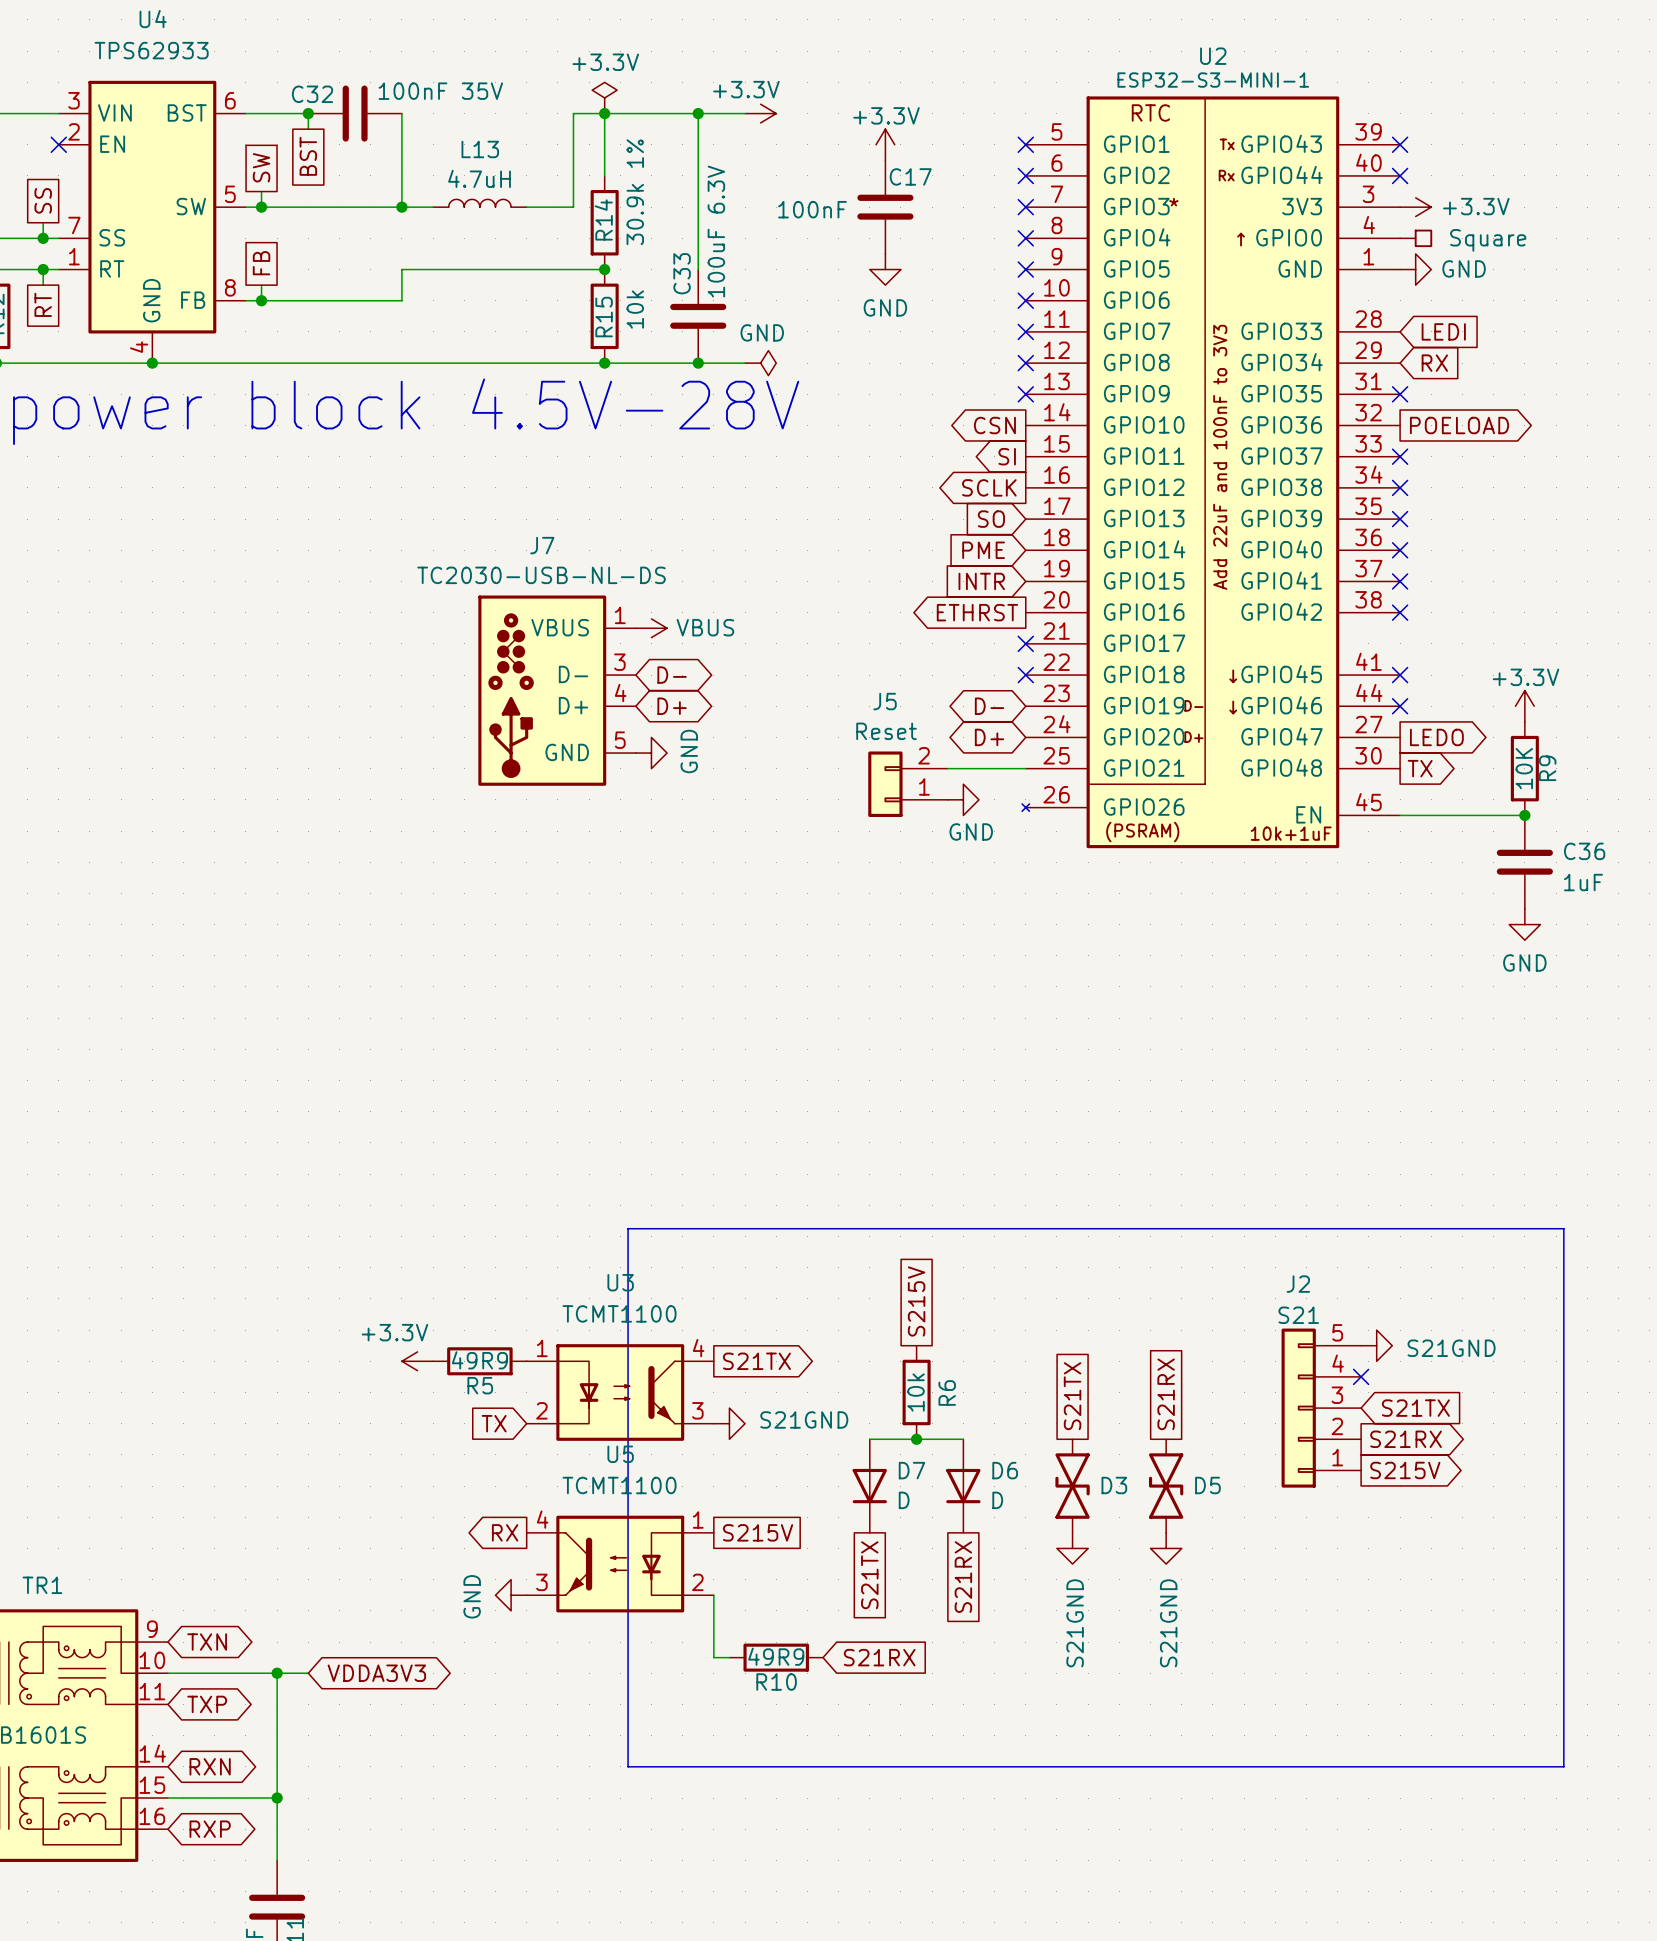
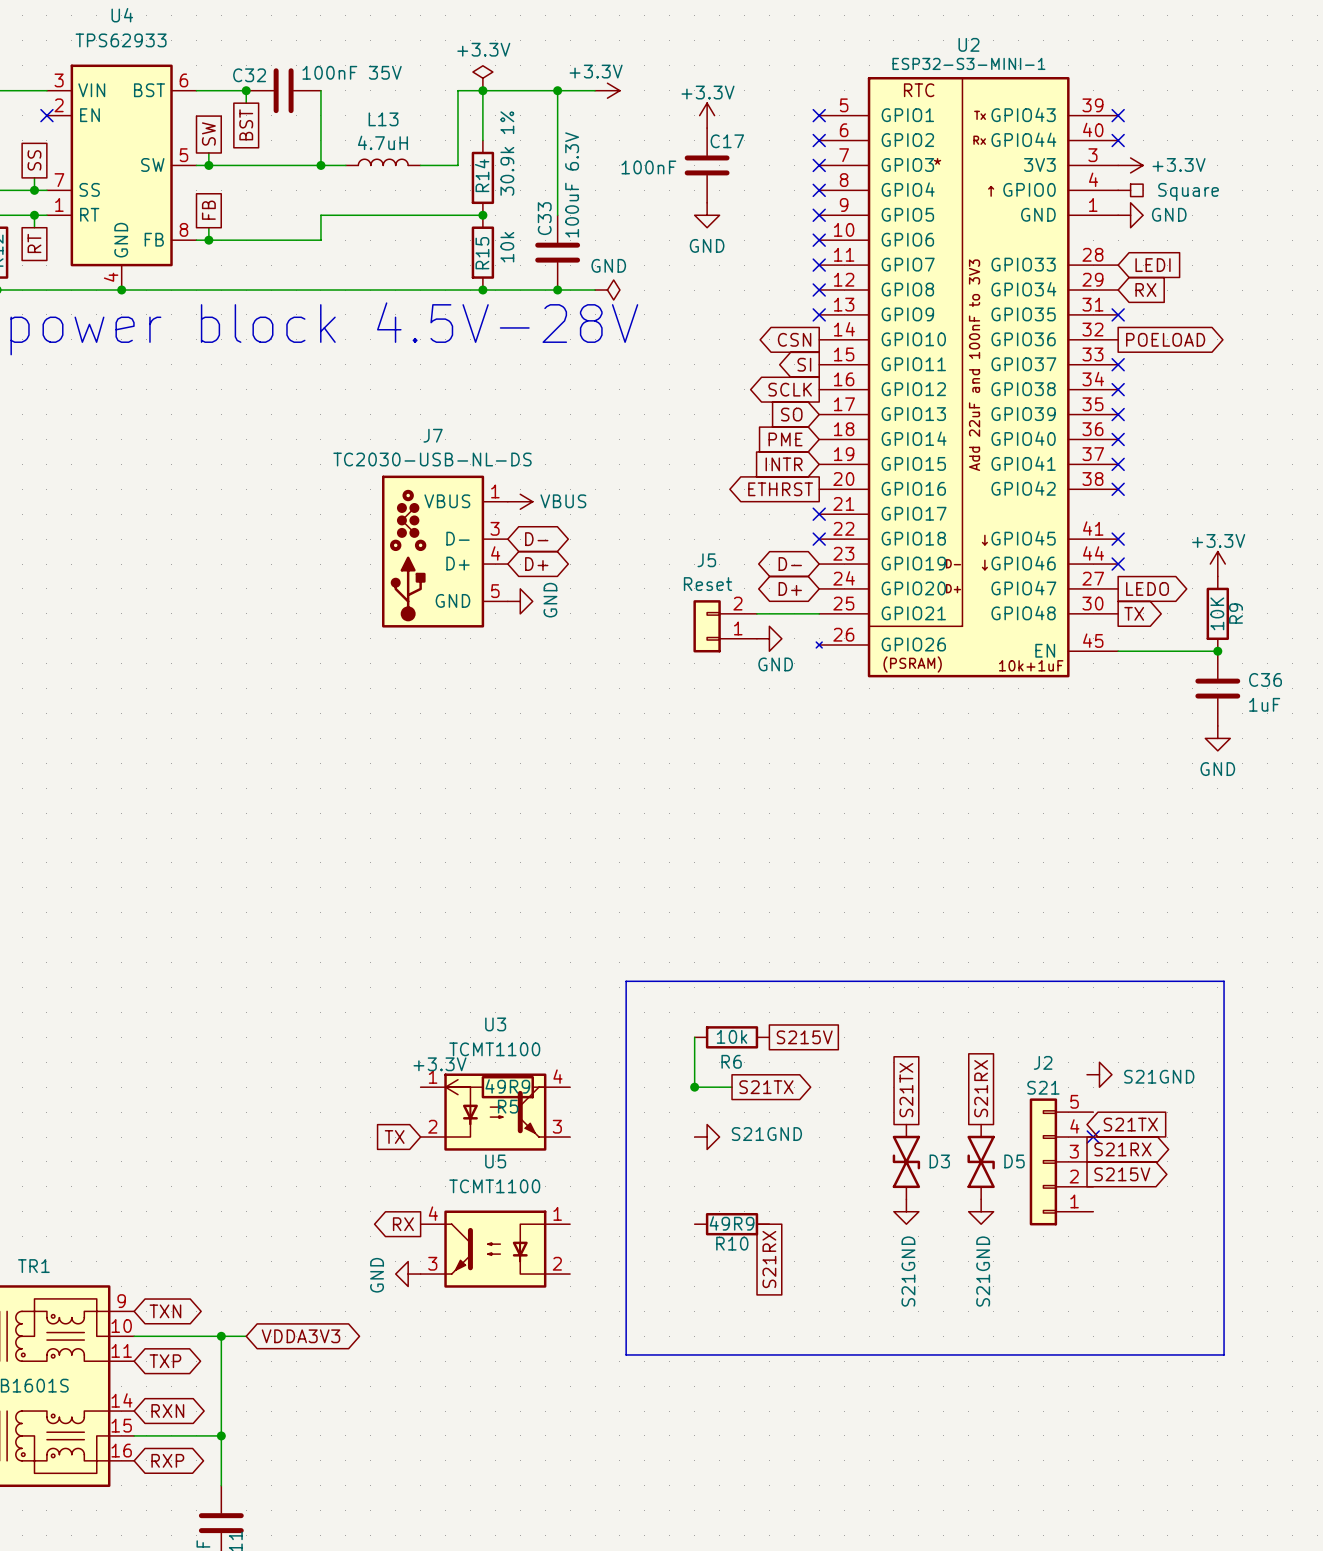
line: (784, 1228) (628, 1228) (628, 1766) (1563, 1766) (1563, 1228) (1532, 1228) -> (626, 981) (626, 1354) (1224, 1354) (1224, 981)
wire: none -> (694, 1037) (694, 1087) (732, 1087)
global label rotation: 0° (916, 1301) -> 90° clockwise (804, 1037)
power symbol position: +3.3V (417, 1361) -> +3.3V (457, 1087)
R5 position: (479, 1361) -> (507, 1087)
global label: S21TX (756, 1361) -> none
junction: none -> (694, 1087)
global label: none -> S21TX (766, 1087)
no-connect mark position: (1361, 1376) -> (1093, 1137)
R6 rotation: 0° (916, 1392) -> 90° clockwise (732, 1037)
R6 position: (916, 1392) -> (732, 1037)
global label position: S21RX (1166, 1394) -> S21RX (981, 1088)
global label position: S21TX (1072, 1396) -> S21TX (906, 1090)
J2 position: (1321, 1408) -> (1061, 1161)
power symbol: S21GND (729, 1423) -> none
power symbol: none -> S21GND (707, 1137)
wire: (869, 1439) (963, 1439) -> none
junction: (916, 1439) -> none
D7: D (869, 1486) -> none
D6: D (963, 1486) -> none
D3 position: (1072, 1486) -> (906, 1161)
D5 position: (1166, 1486) -> (981, 1161)
power symbol: none -> S21GND (906, 1211)
power symbol: none -> S21GND (981, 1211)
global label: S215V (758, 1532) -> none
power symbol: S21GND (1072, 1548) -> none
power symbol: S21GND (1166, 1548) -> none
global label: S21TX (869, 1575) -> none
wire: (713, 1595) (713, 1657) (729, 1657) -> none
R10 position: (776, 1657) -> (732, 1224)
global label: S21RX (879, 1657) -> none

